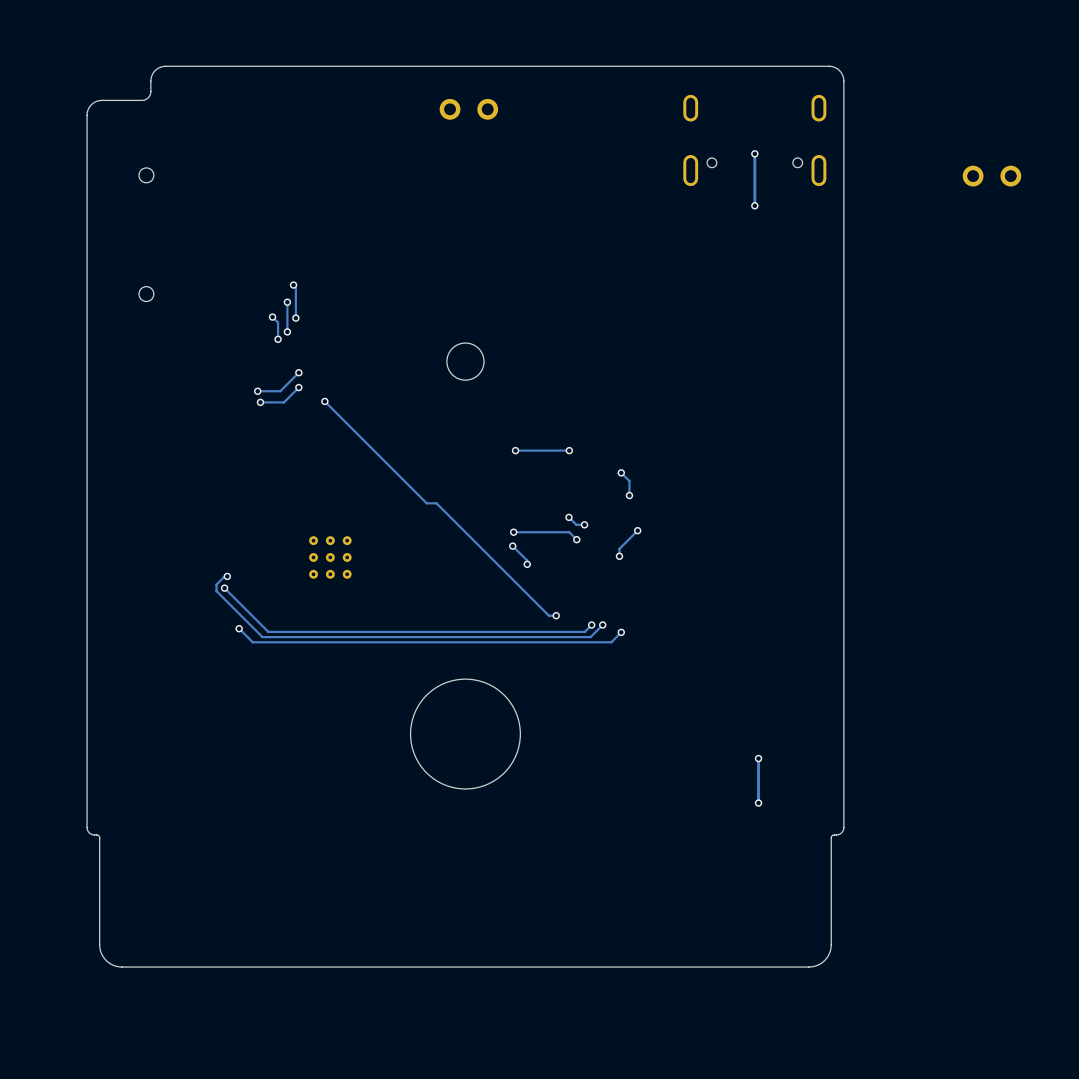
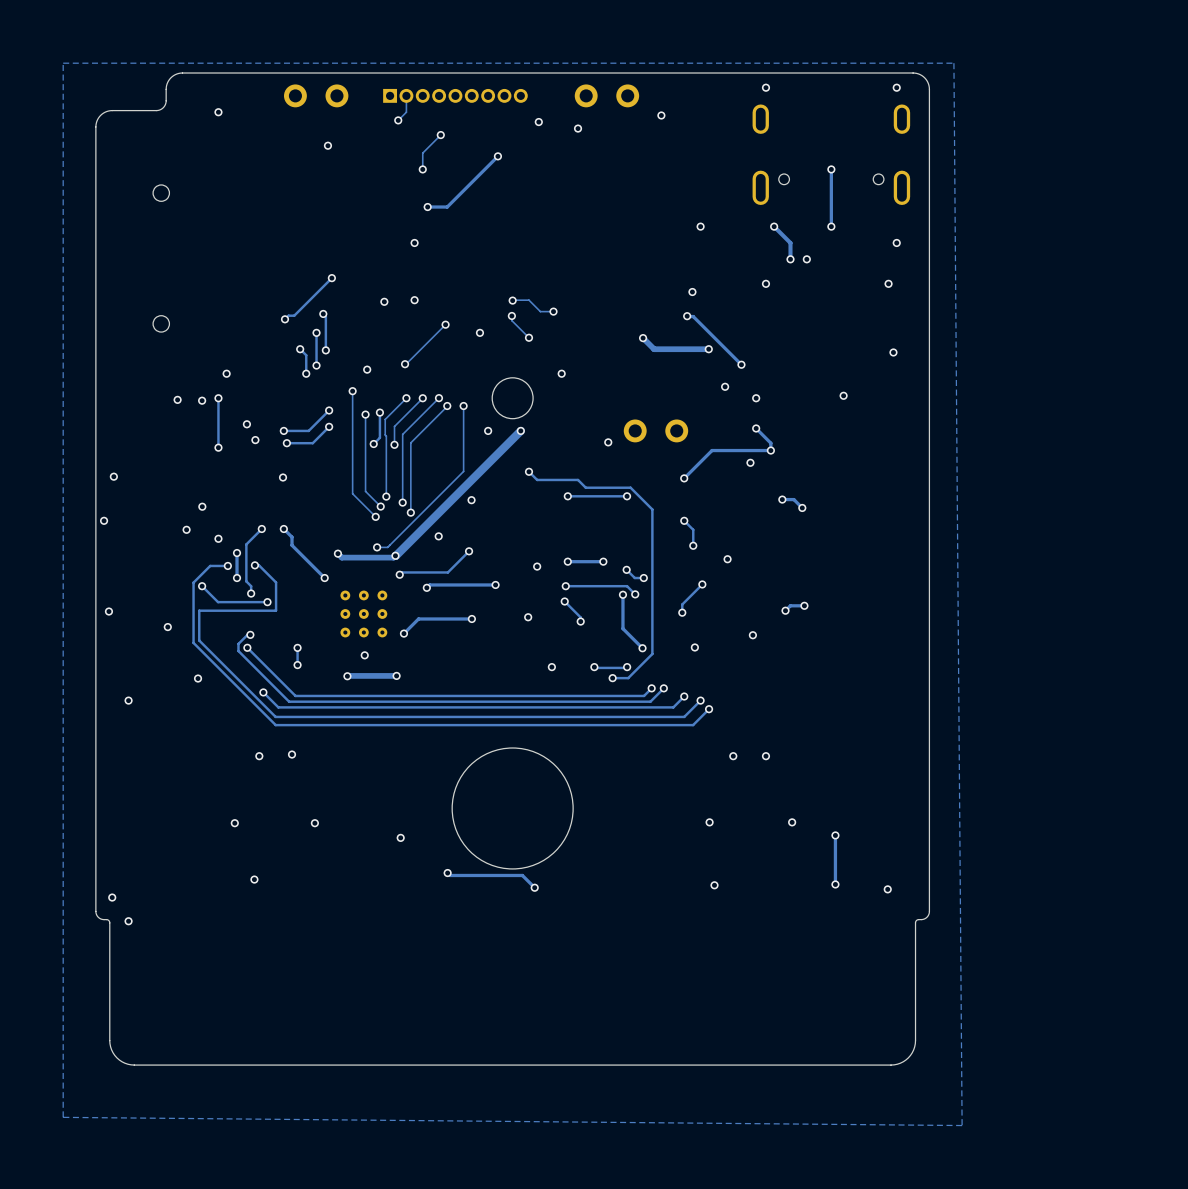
zone outline: none -> (953, 63) (63, 63) (63, 1117) (962, 1125) (953, 63)
via: none -> (765, 87)
via: none -> (896, 87)
part: none -> (316, 95)
track: none -> (406, 95) (406, 112) (398, 120)
part: none -> (455, 95)
via: none -> (218, 112)
via: none -> (661, 115)
via: none -> (398, 120)
part position: (468, 109) -> (606, 95)
via: none -> (538, 122)
via: none -> (578, 128)
track: none -> (440, 135) (422, 153) (422, 169)
via: none -> (440, 135)
via: none -> (327, 145)
track: none -> (497, 156) (447, 207) (427, 207)
via: none -> (497, 156)
via: none -> (422, 169)
part: (991, 176) -> none
via: none -> (427, 207)
via: none -> (700, 226)
track: none -> (774, 226) (790, 242) (790, 259)
via: none -> (774, 226)
via: none -> (414, 242)
via: none -> (896, 242)
via: none -> (790, 259)
via: none -> (806, 259)
track: none -> (331, 278) (294, 315) (288, 315) (285, 319)
via: none -> (331, 278)
via: none -> (765, 283)
via: none -> (888, 283)
via: none -> (692, 292)
via: none -> (414, 300)
track: none -> (512, 300) (528, 300) (540, 311) (553, 311)
via: none -> (512, 300)
via: none -> (384, 301)
via: none -> (553, 311)
track: none -> (511, 315) (511, 320) (528, 337)
via: none -> (511, 315)
track: none -> (687, 316) (693, 316) (741, 364)
via: none -> (687, 316)
via: none -> (285, 319)
track: none -> (445, 324) (405, 364)
via: none -> (445, 324)
via: none -> (479, 332)
via: none -> (528, 337)
track: none -> (643, 338) (654, 349) (708, 349)
via: none -> (643, 338)
via: none -> (708, 349)
via: none -> (893, 352)
via: none -> (405, 364)
via: none -> (741, 364)
via: none -> (367, 369)
via: none -> (226, 373)
via: none -> (561, 373)
via: none -> (725, 386)
track: none -> (352, 391) (352, 493) (375, 516)
via: none -> (352, 391)
via: none -> (843, 395)
track: none -> (218, 398) (218, 447)
via: none -> (218, 398)
track: none -> (406, 398) (385, 419) (386, 496)
via: none -> (406, 398)
track: none -> (422, 398) (394, 426) (394, 444)
via: none -> (422, 398)
track: none -> (438, 398) (402, 434) (402, 502)
via: none -> (438, 398)
via: none -> (756, 398)
via: none -> (177, 399)
via: none -> (202, 400)
track: none -> (447, 406) (410, 442) (410, 512)
via: none -> (447, 406)
track: none -> (463, 406) (463, 471) (387, 547) (377, 547)
via: none -> (463, 406)
track: none -> (379, 412) (379, 437) (373, 444)
via: none -> (379, 412)
track: none -> (365, 414) (365, 491) (380, 506)
via: none -> (365, 414)
via: none -> (246, 424)
track: none -> (756, 428) (770, 443) (770, 450) (712, 450) (684, 478)
via: none -> (756, 428)
via: none -> (488, 430)
track: none -> (520, 430) (393, 557) (341, 557) (337, 553)
via: none -> (520, 430)
part: none -> (655, 430)
via: none -> (255, 440)
track: (324, 401) (426, 503) (436, 503) (548, 615) (556, 615) -> (528, 471) (537, 479) (578, 479) (585, 487) (630, 487) (652, 509) (652, 653) (628, 678) (612, 678)
via: (324, 401) -> none
via: none -> (608, 442)
via: none -> (373, 444)
via: none -> (394, 444)
via: none -> (218, 447)
via: none -> (770, 450)
via: none -> (750, 462)
via: none -> (528, 471)
via: none -> (113, 476)
via: none -> (283, 477)
via: none -> (684, 478)
via: none -> (386, 496)
track: none -> (782, 499) (793, 499) (802, 507)
via: none -> (782, 499)
via: none -> (471, 500)
via: none -> (402, 502)
via: none -> (380, 506)
via: none -> (202, 506)
via: none -> (802, 507)
via: none -> (410, 512)
via: none -> (375, 516)
via: none -> (104, 520)
track: none -> (261, 528) (246, 544) (246, 581) (251, 586) (251, 593)
via: none -> (261, 528)
track: none -> (283, 528) (292, 537) (292, 545) (324, 578)
via: none -> (283, 528)
via: none -> (186, 529)
via: none -> (438, 536)
via: none -> (218, 538)
track: none -> (389, 545) (389, 545)
via: none -> (377, 547)
track: none -> (469, 551) (447, 572) (402, 572) (399, 574)
via: none -> (469, 551)
track: none -> (237, 553) (237, 578)
via: none -> (237, 553)
via: none -> (337, 553)
via: none -> (395, 555)
via: none -> (727, 559)
via: none -> (567, 561)
track: none -> (603, 561) (567, 561)
via: none -> (603, 561)
track: none -> (227, 565) (210, 565) (193, 582) (193, 642) (275, 725) (693, 725) (709, 709)
via: none -> (227, 565)
track: none -> (254, 565) (258, 565) (276, 582) (276, 610) (199, 610) (199, 640) (275, 716) (684, 716) (700, 700)
via: none -> (254, 565)
via: none -> (537, 566)
via: none -> (399, 574)
via: none -> (237, 578)
via: none -> (324, 578)
track: none -> (495, 584) (429, 584) (426, 587)
via: none -> (495, 584)
track: none -> (202, 586) (218, 602) (267, 602)
via: none -> (202, 586)
via: none -> (426, 587)
via: none -> (251, 593)
track: none -> (622, 594) (622, 628) (642, 648)
via: none -> (622, 594)
via: none -> (267, 602)
track: none -> (804, 605) (790, 605) (785, 610)
via: none -> (804, 605)
via: none -> (785, 610)
via: none -> (108, 611)
via: none -> (528, 617)
track: none -> (471, 618) (418, 618) (403, 633)
via: none -> (471, 618)
via: none -> (167, 627)
via: none -> (403, 633)
via: none -> (752, 635)
via: none -> (694, 647)
track: none -> (297, 647) (297, 665)
via: none -> (297, 647)
via: none -> (642, 648)
via: none -> (364, 655)
via: none -> (297, 665)
via: none -> (551, 667)
via: none -> (594, 667)
track: none -> (627, 667) (594, 667)
via: none -> (627, 667)
track: none -> (396, 675) (347, 676)
via: none -> (396, 675)
via: none -> (347, 676)
via: none -> (198, 678)
via: none -> (128, 700)
via: none -> (700, 700)
via: none -> (709, 709)
via: none -> (292, 754)
via: none -> (259, 756)
via: none -> (733, 756)
via: none -> (765, 756)
via: none -> (709, 822)
via: none -> (792, 822)
via: none -> (234, 823)
via: none -> (314, 823)
via: none -> (400, 837)
track: none -> (447, 873) (450, 875) (522, 875) (534, 887)
via: none -> (447, 873)
via: none -> (254, 879)
via: none -> (714, 885)
via: none -> (534, 887)
via: none -> (887, 889)
via: none -> (112, 897)
via: none -> (128, 921)

